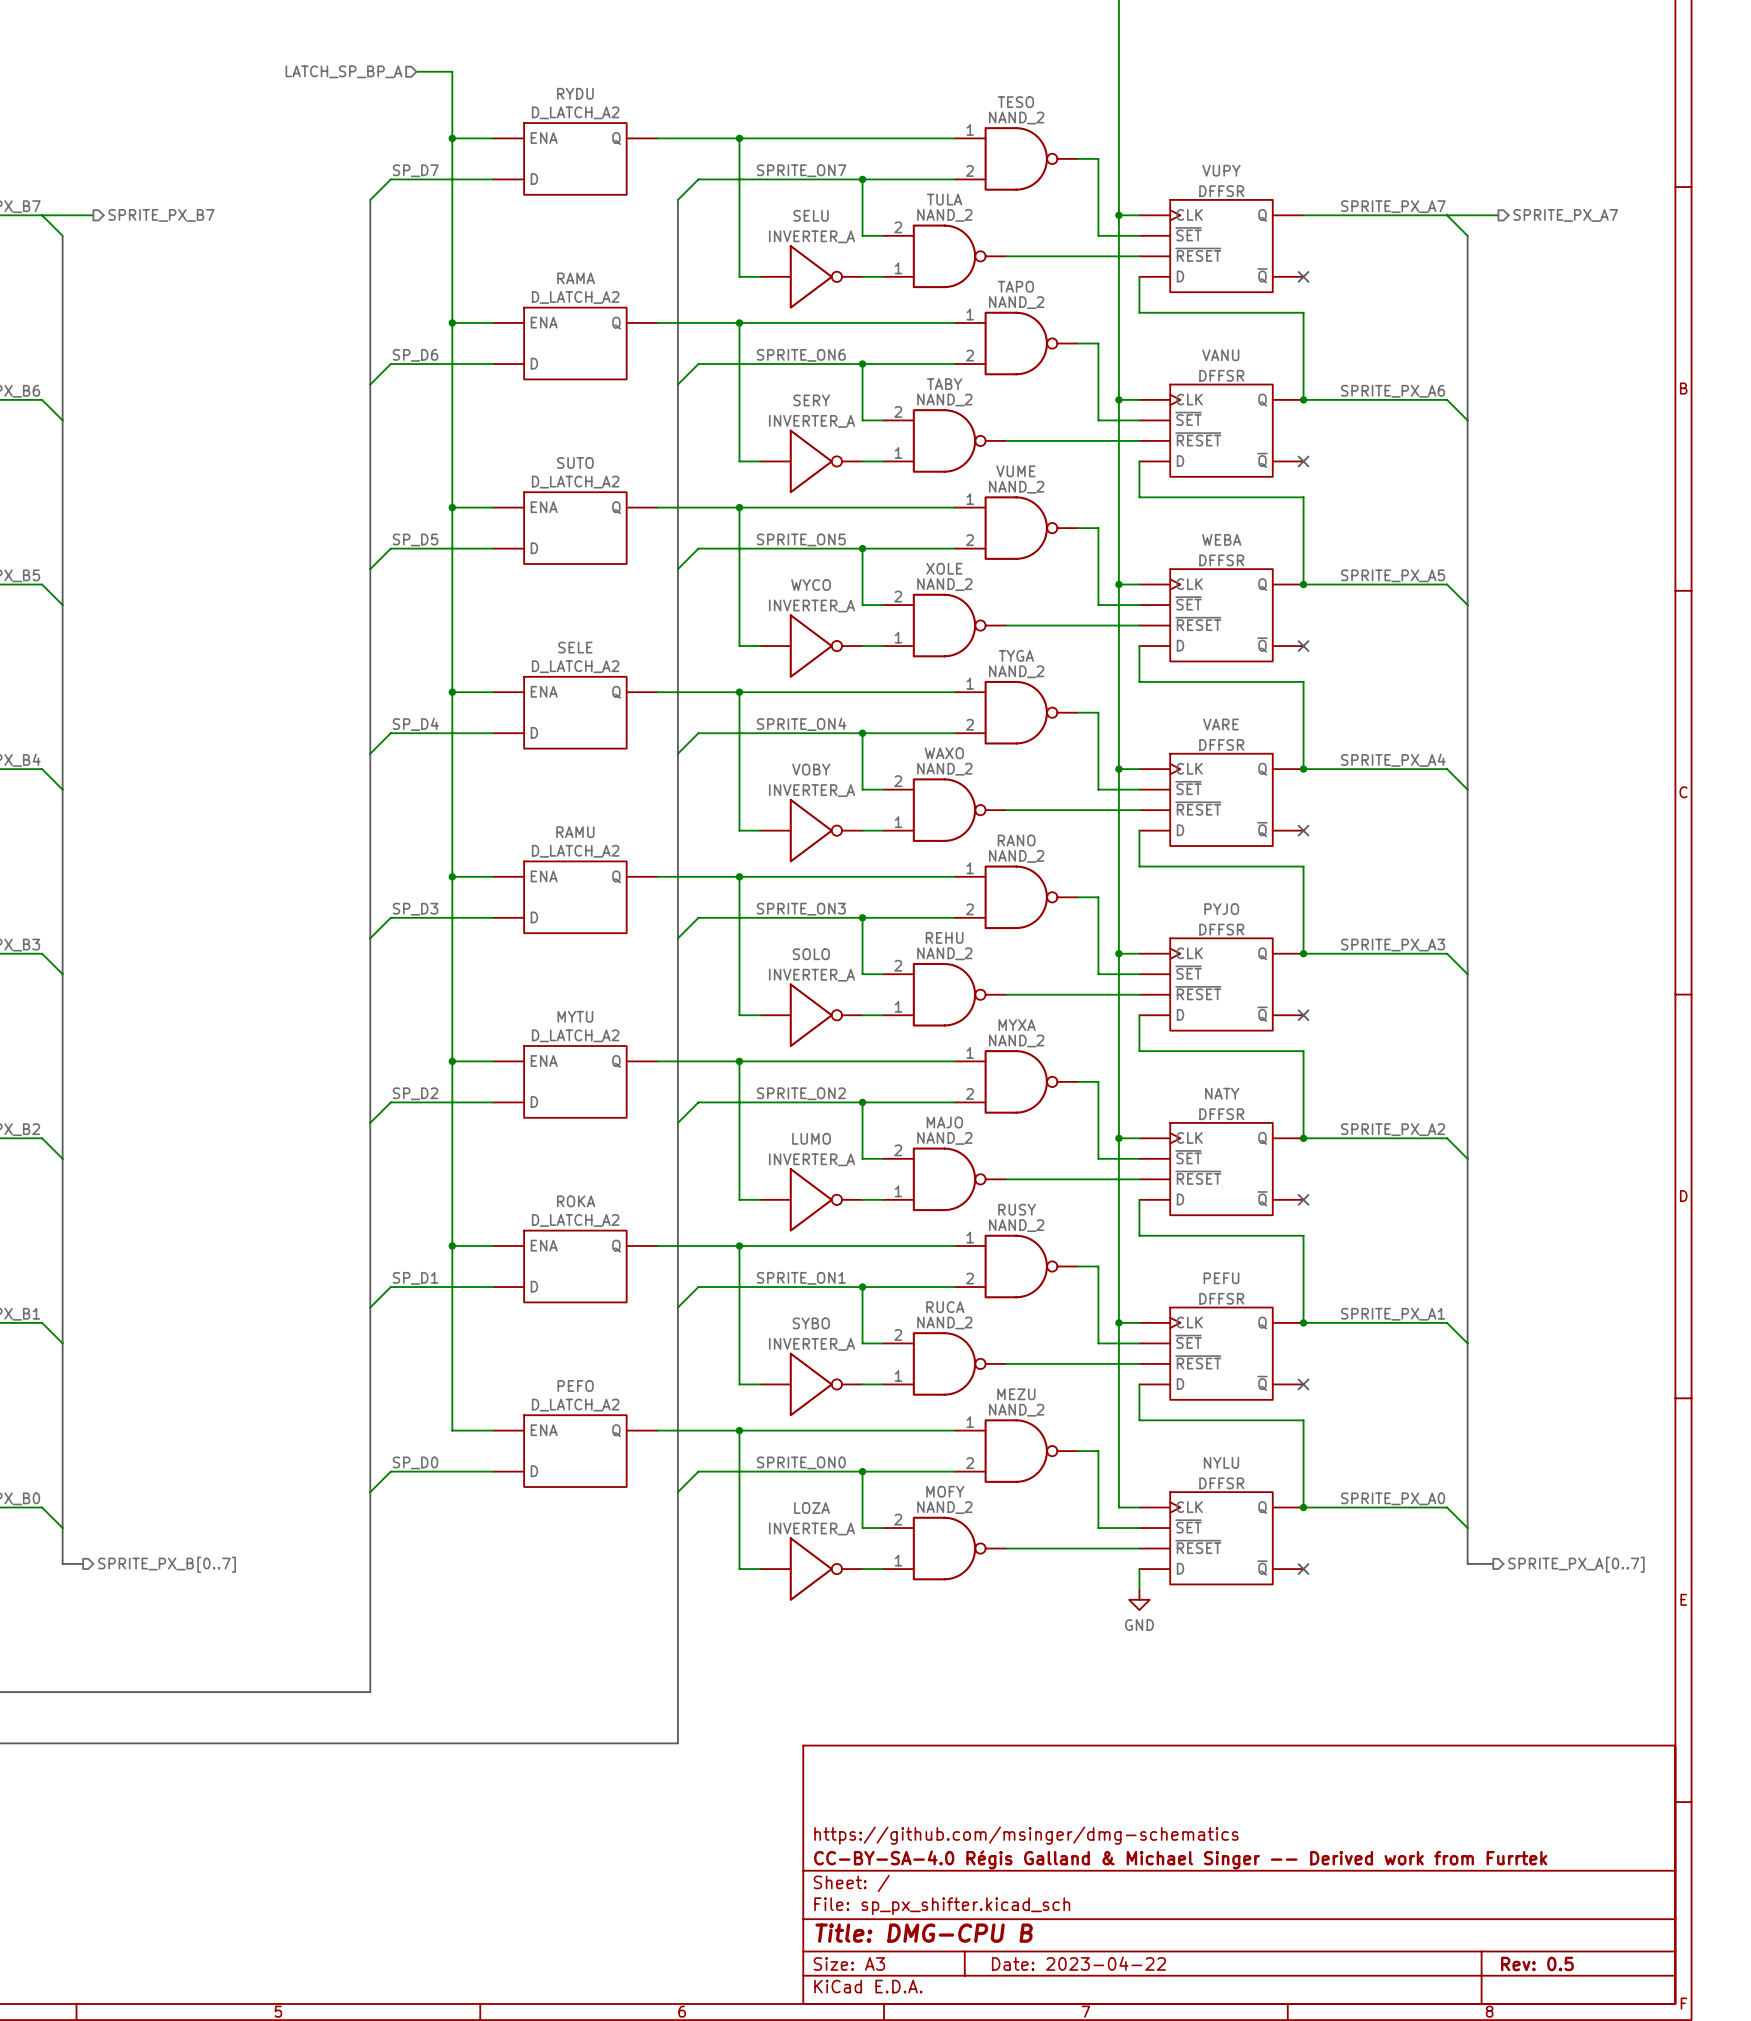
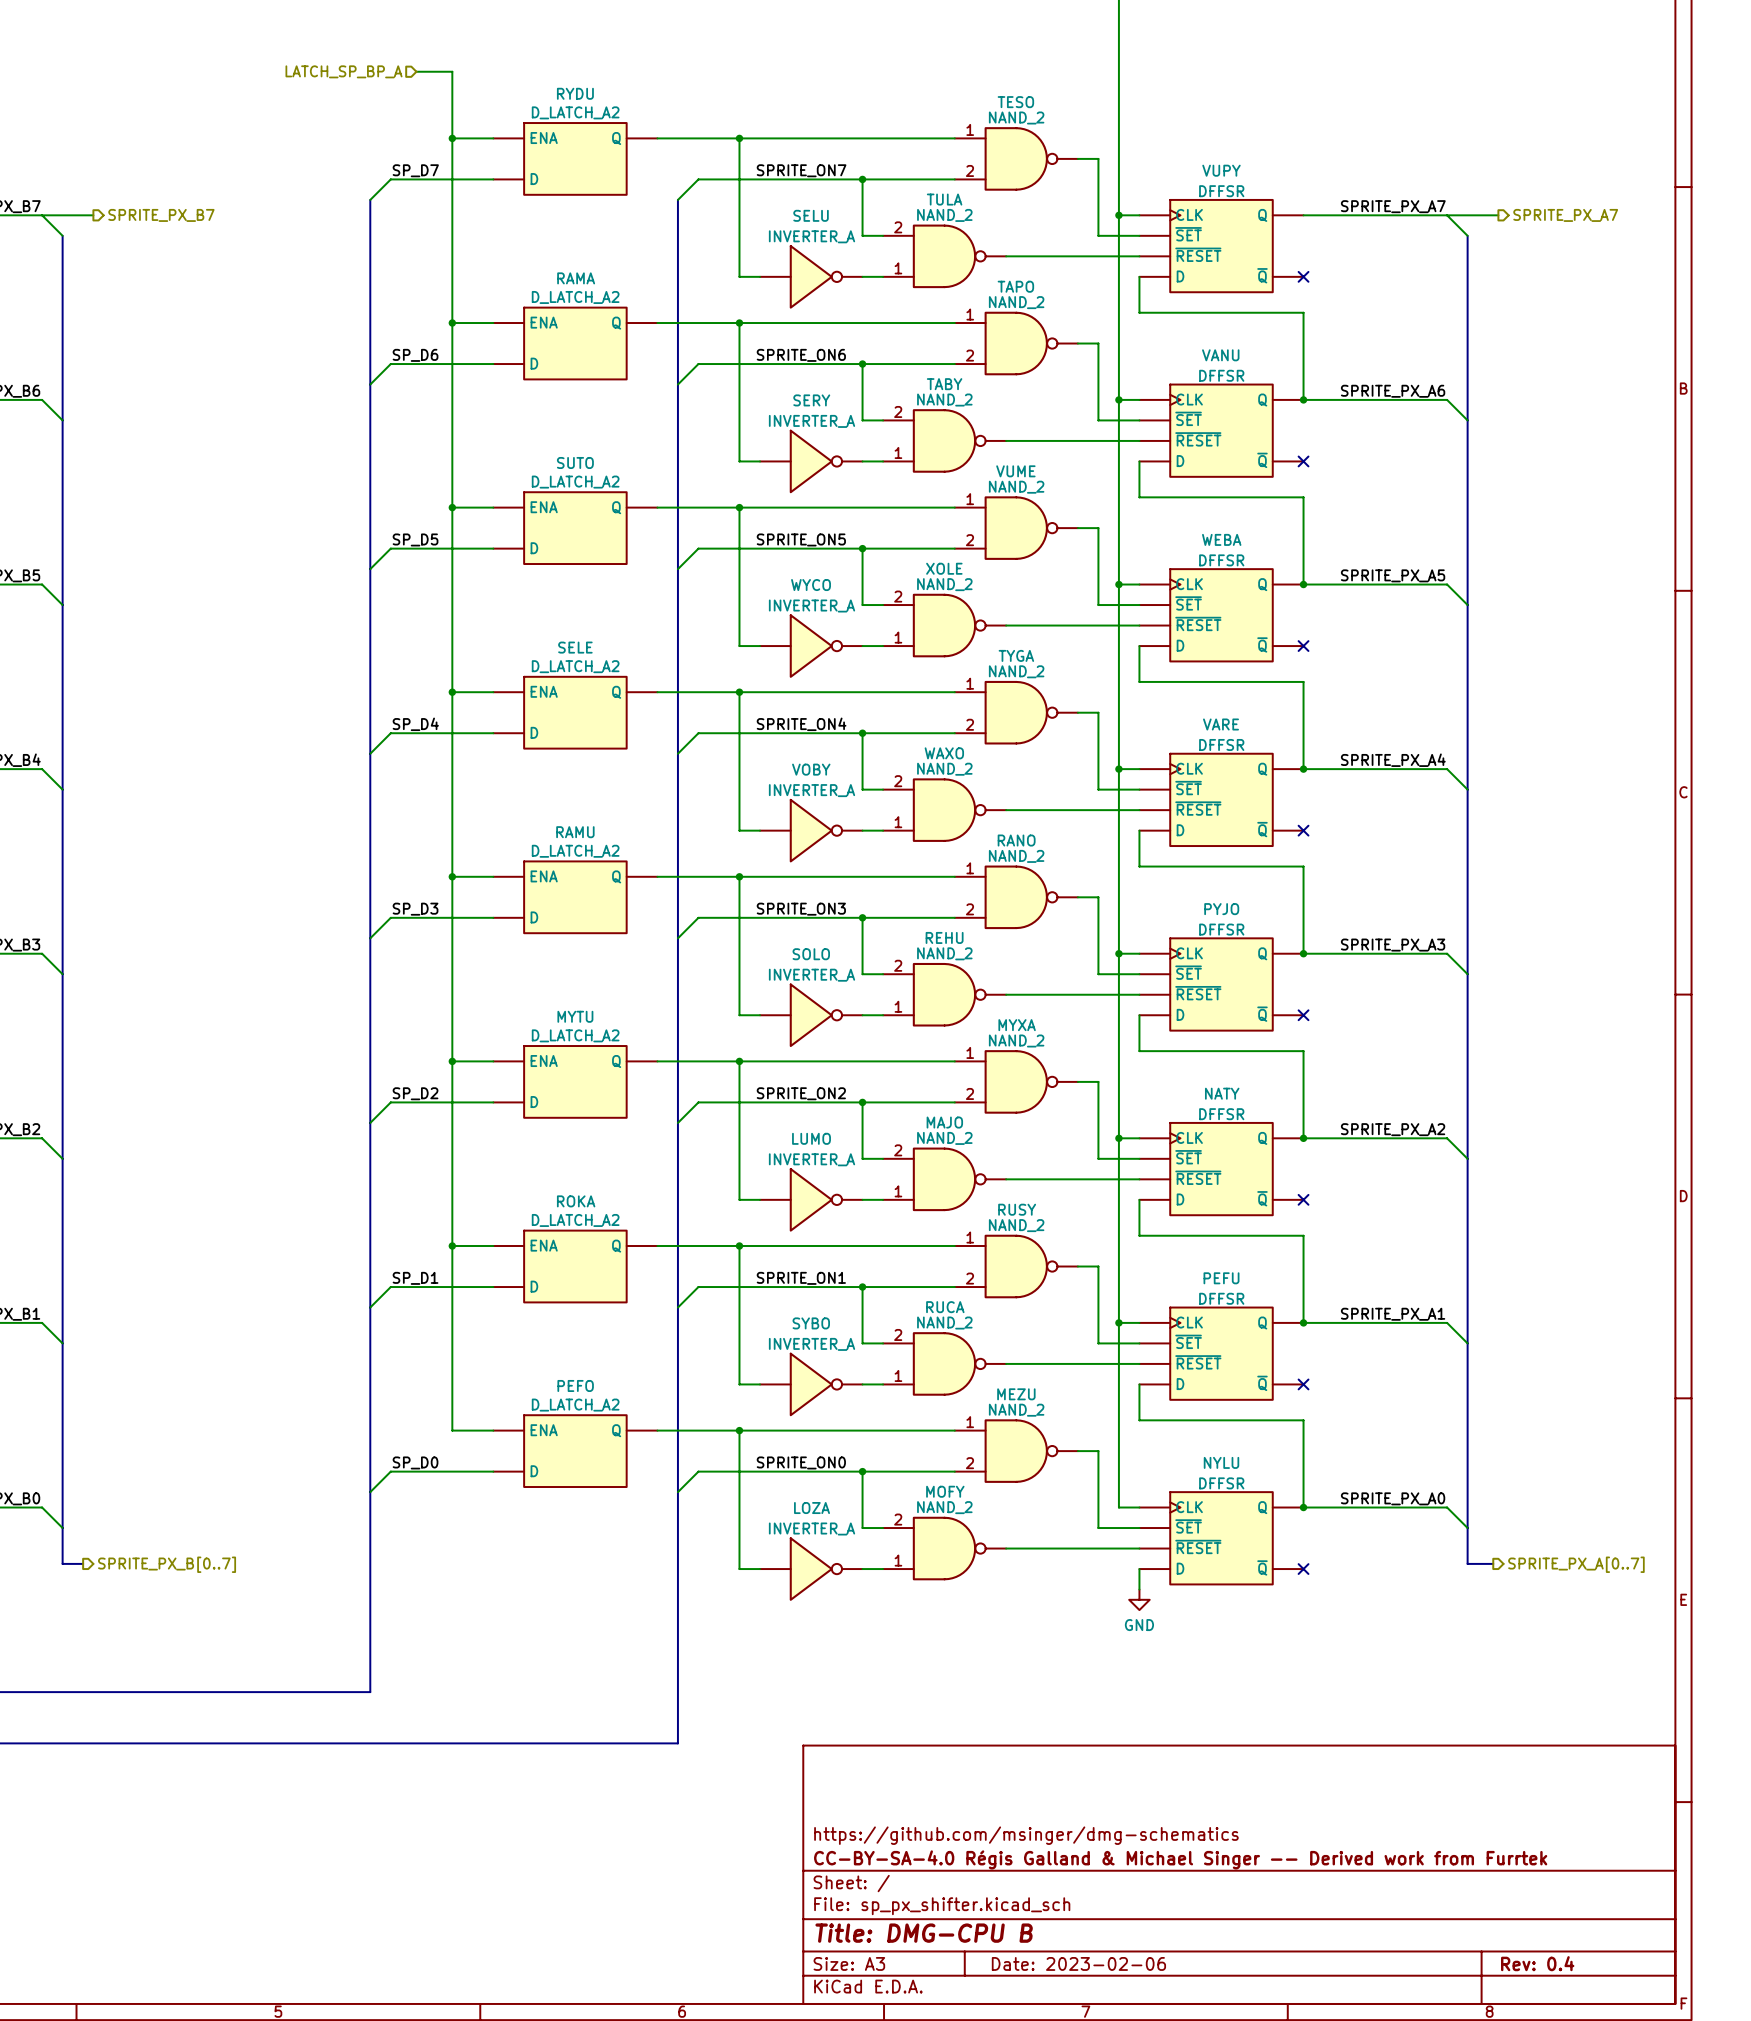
title block: Date: 2023-04-22 (1078, 1963) -> Date: 2023-02-06 (1078, 1963)
title block: Rev: 0.5 (1537, 1963) -> Rev: 0.4 (1537, 1963)

